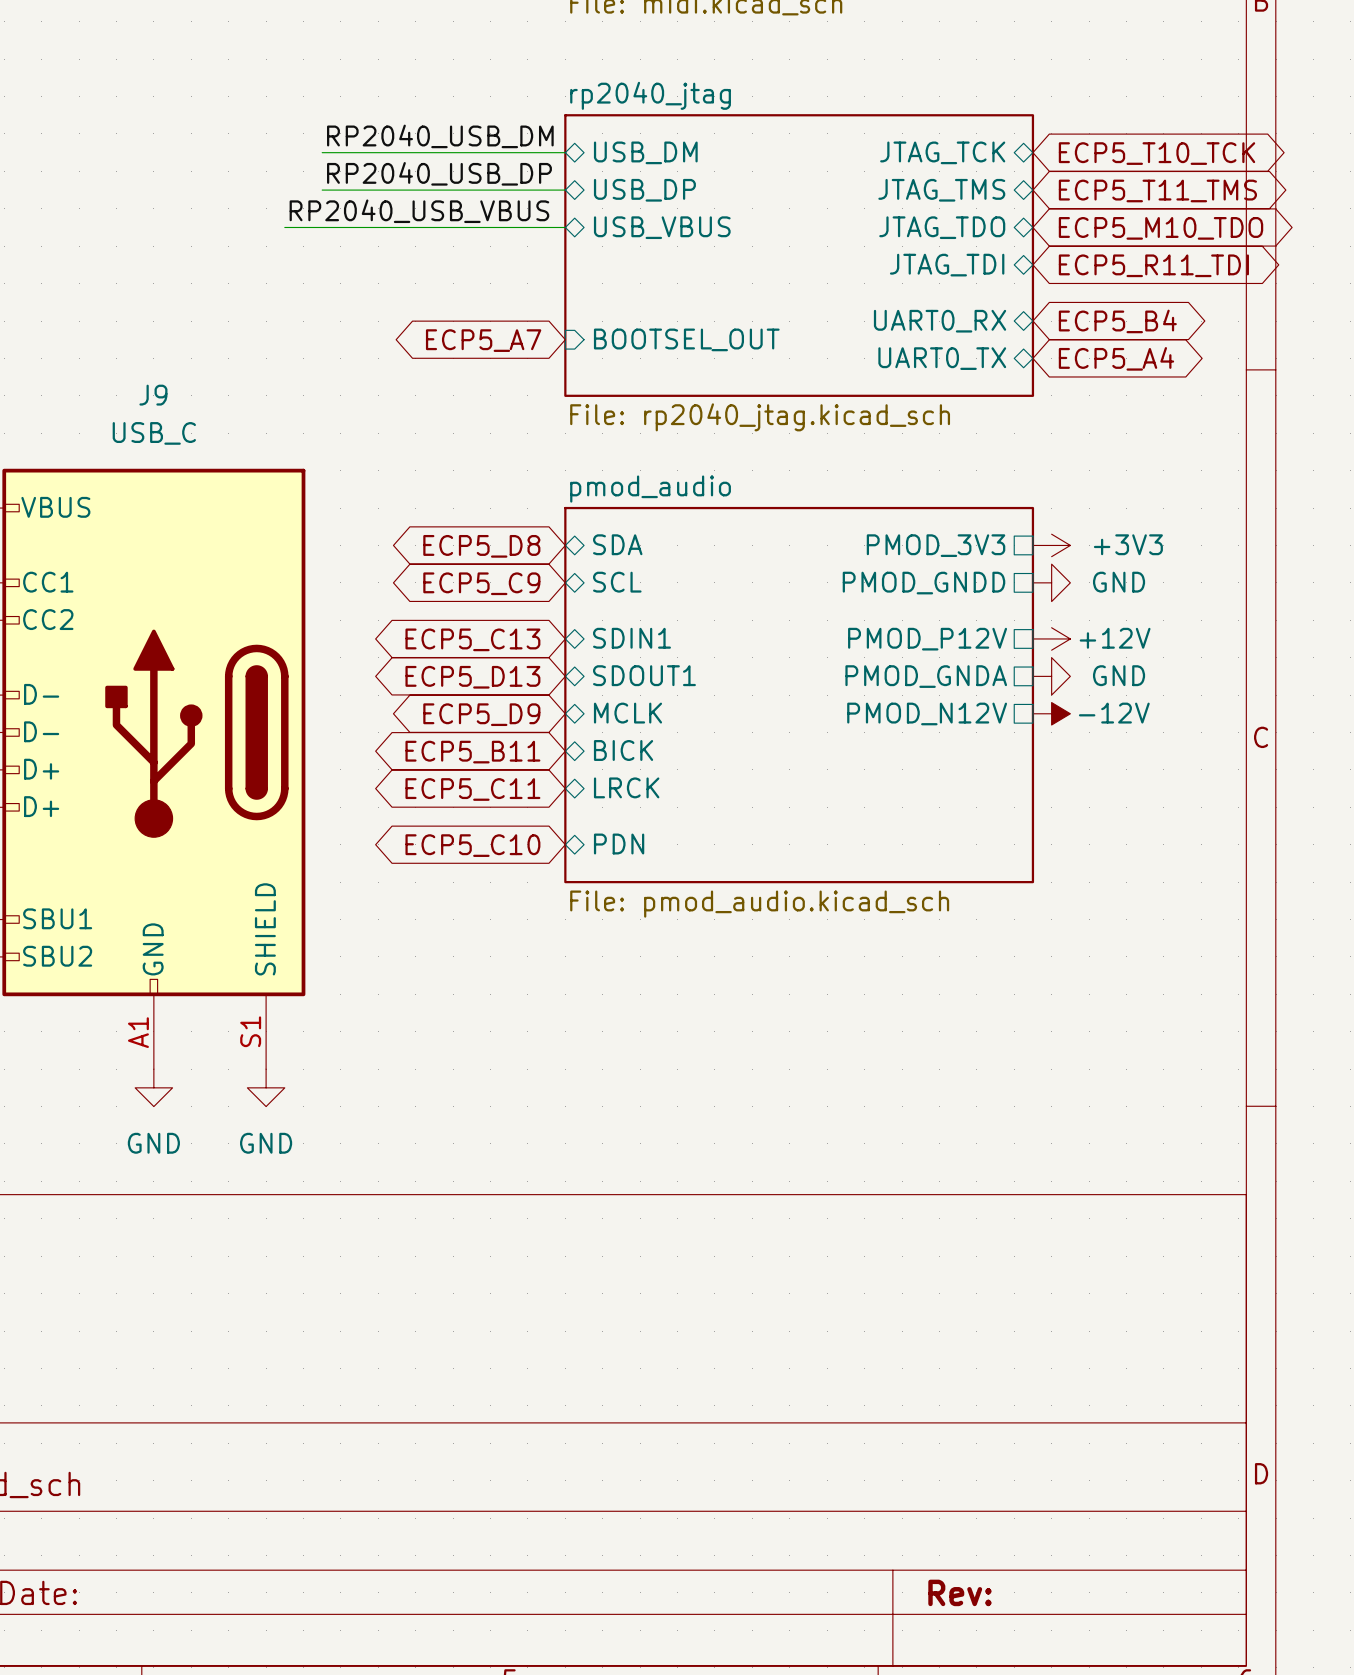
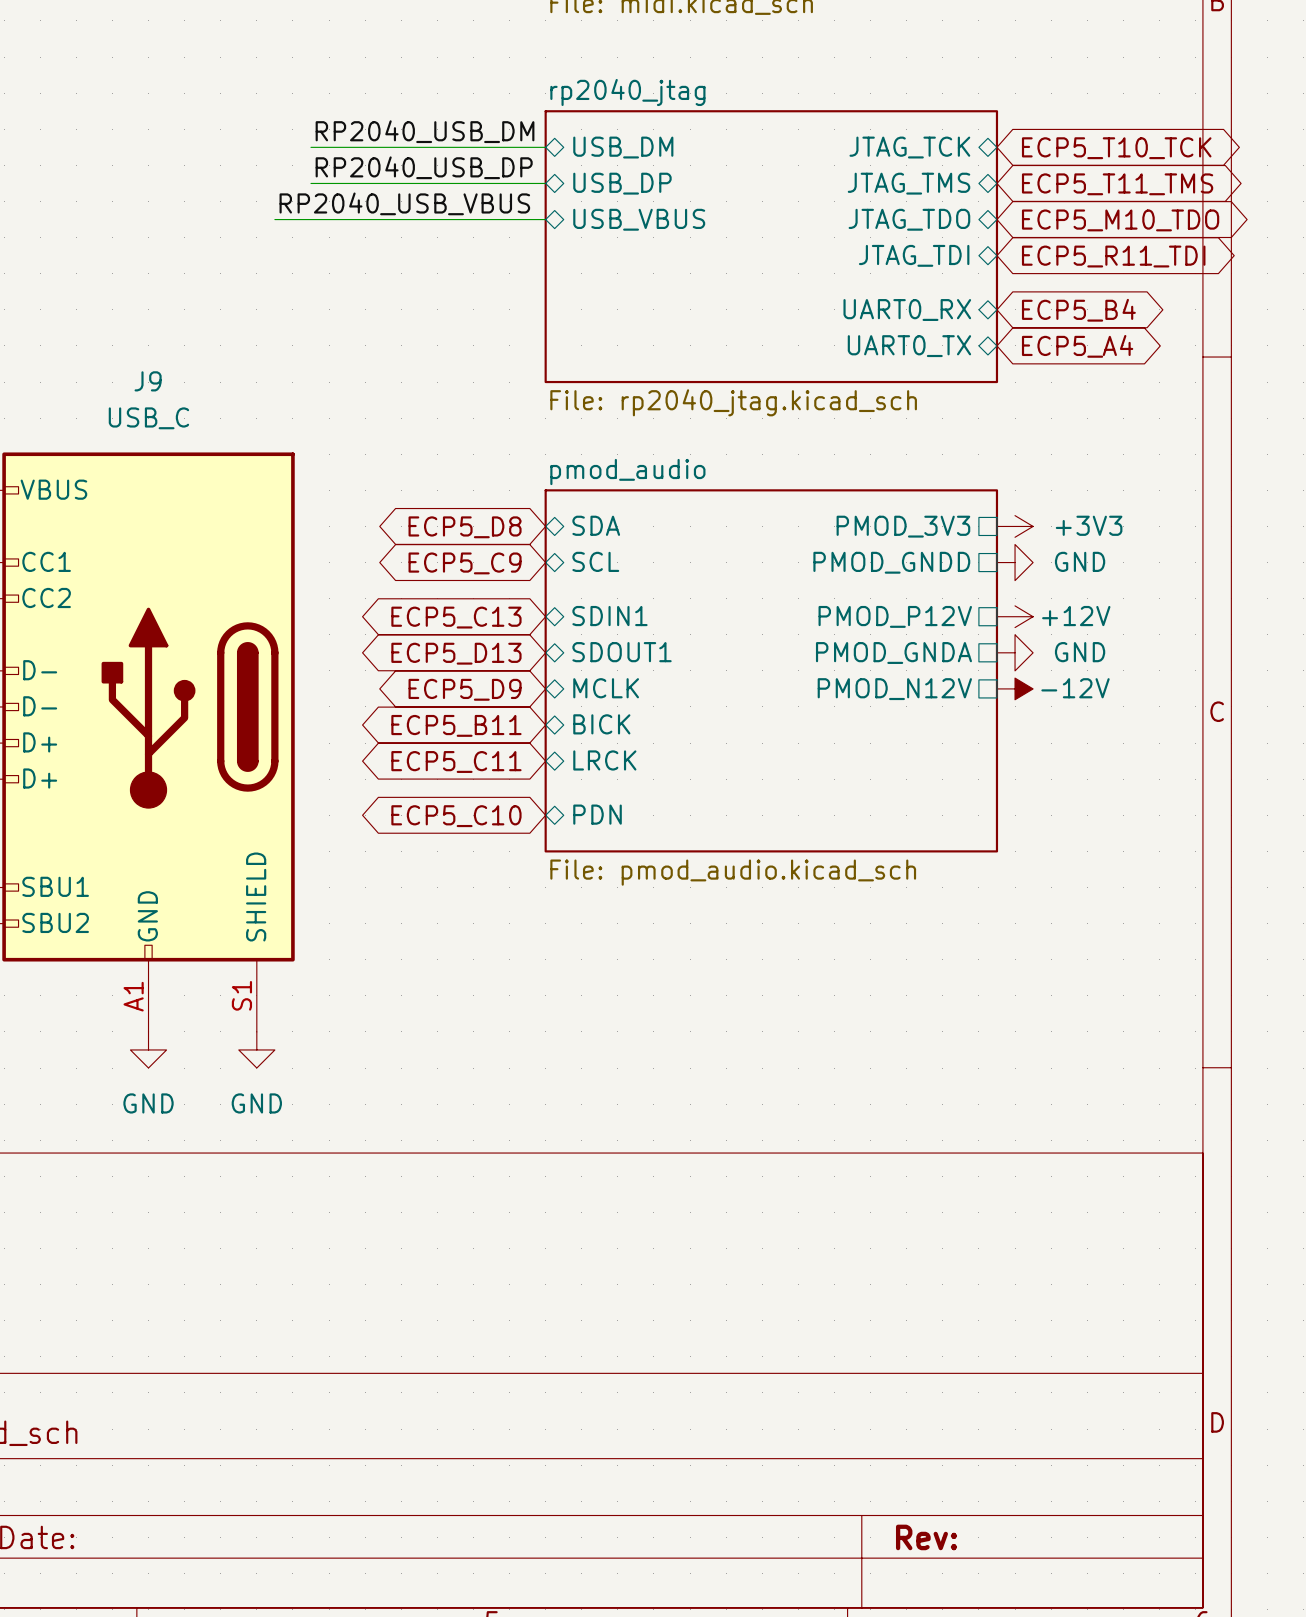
sheet pin: BOOTSEL_OUT (686, 339) -> none
global label: ECP5_A7 (483, 340) -> none

